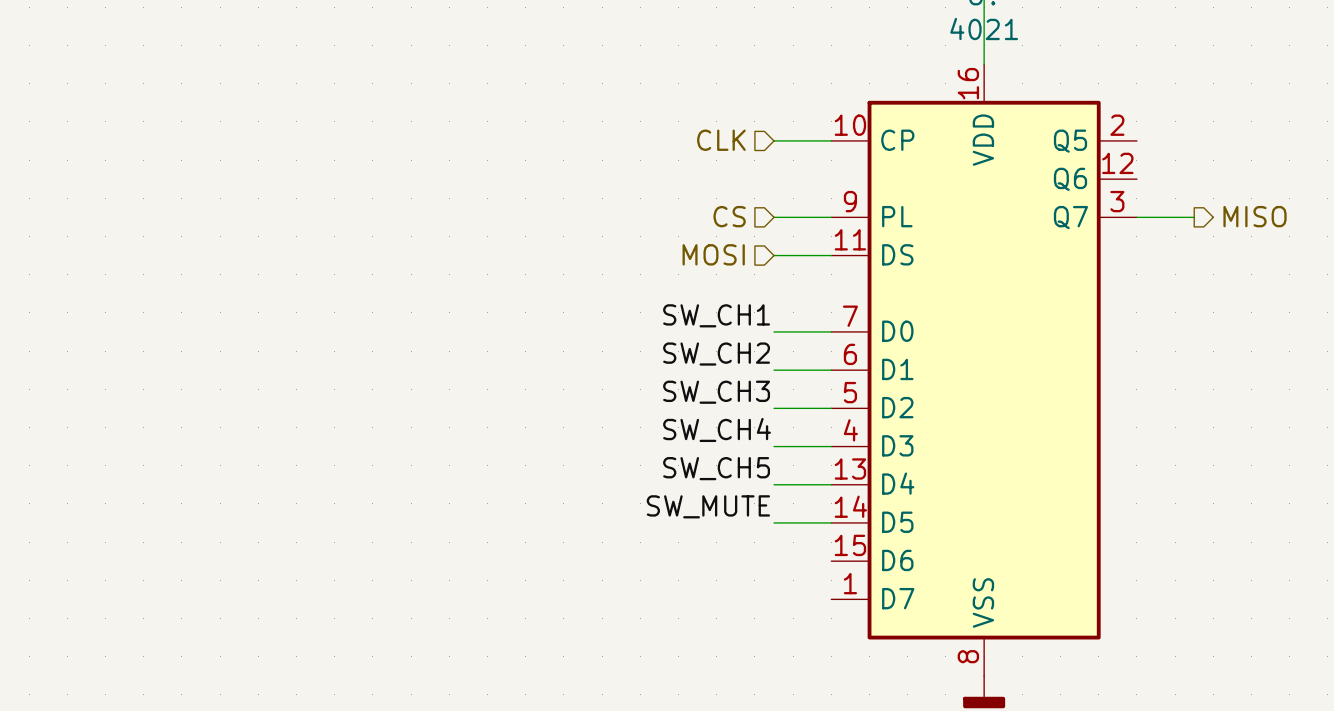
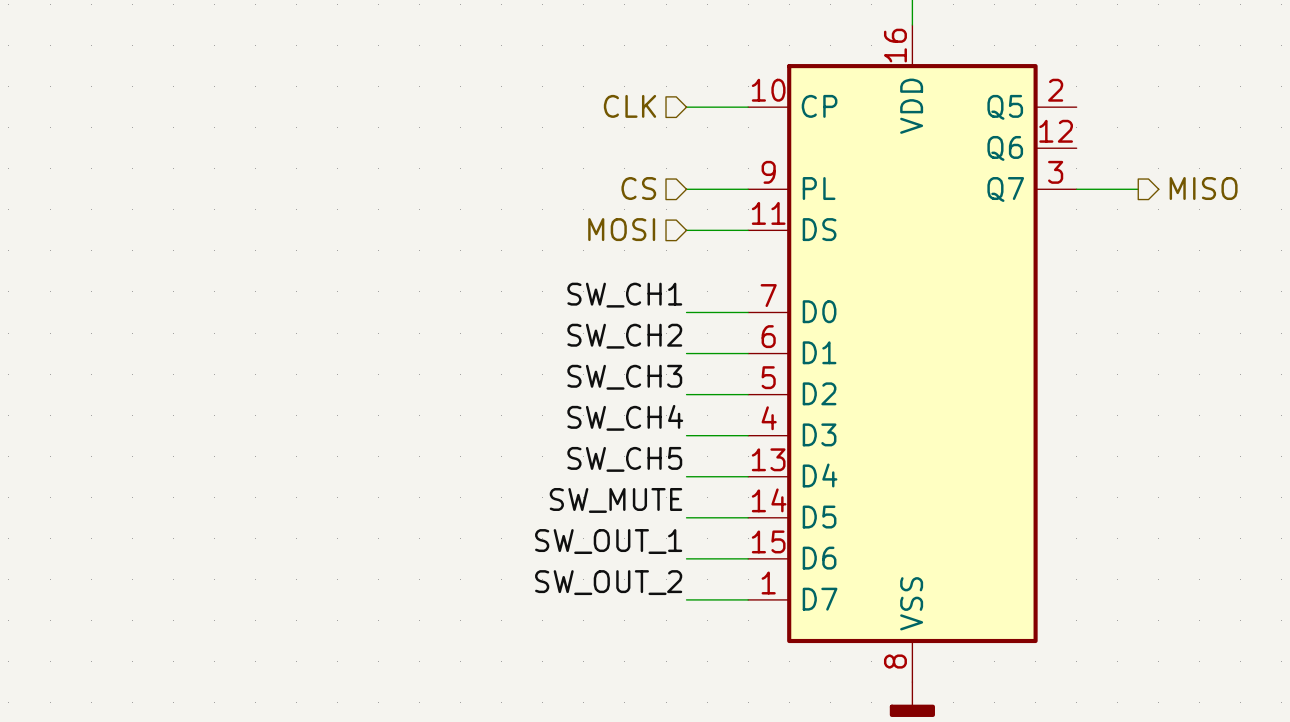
label: none -> SW_OUT_1 (608, 541)
wire: none -> (686, 558) (748, 558)
label: none -> SW_OUT_2 (608, 582)
wire: none -> (686, 599) (748, 599)

